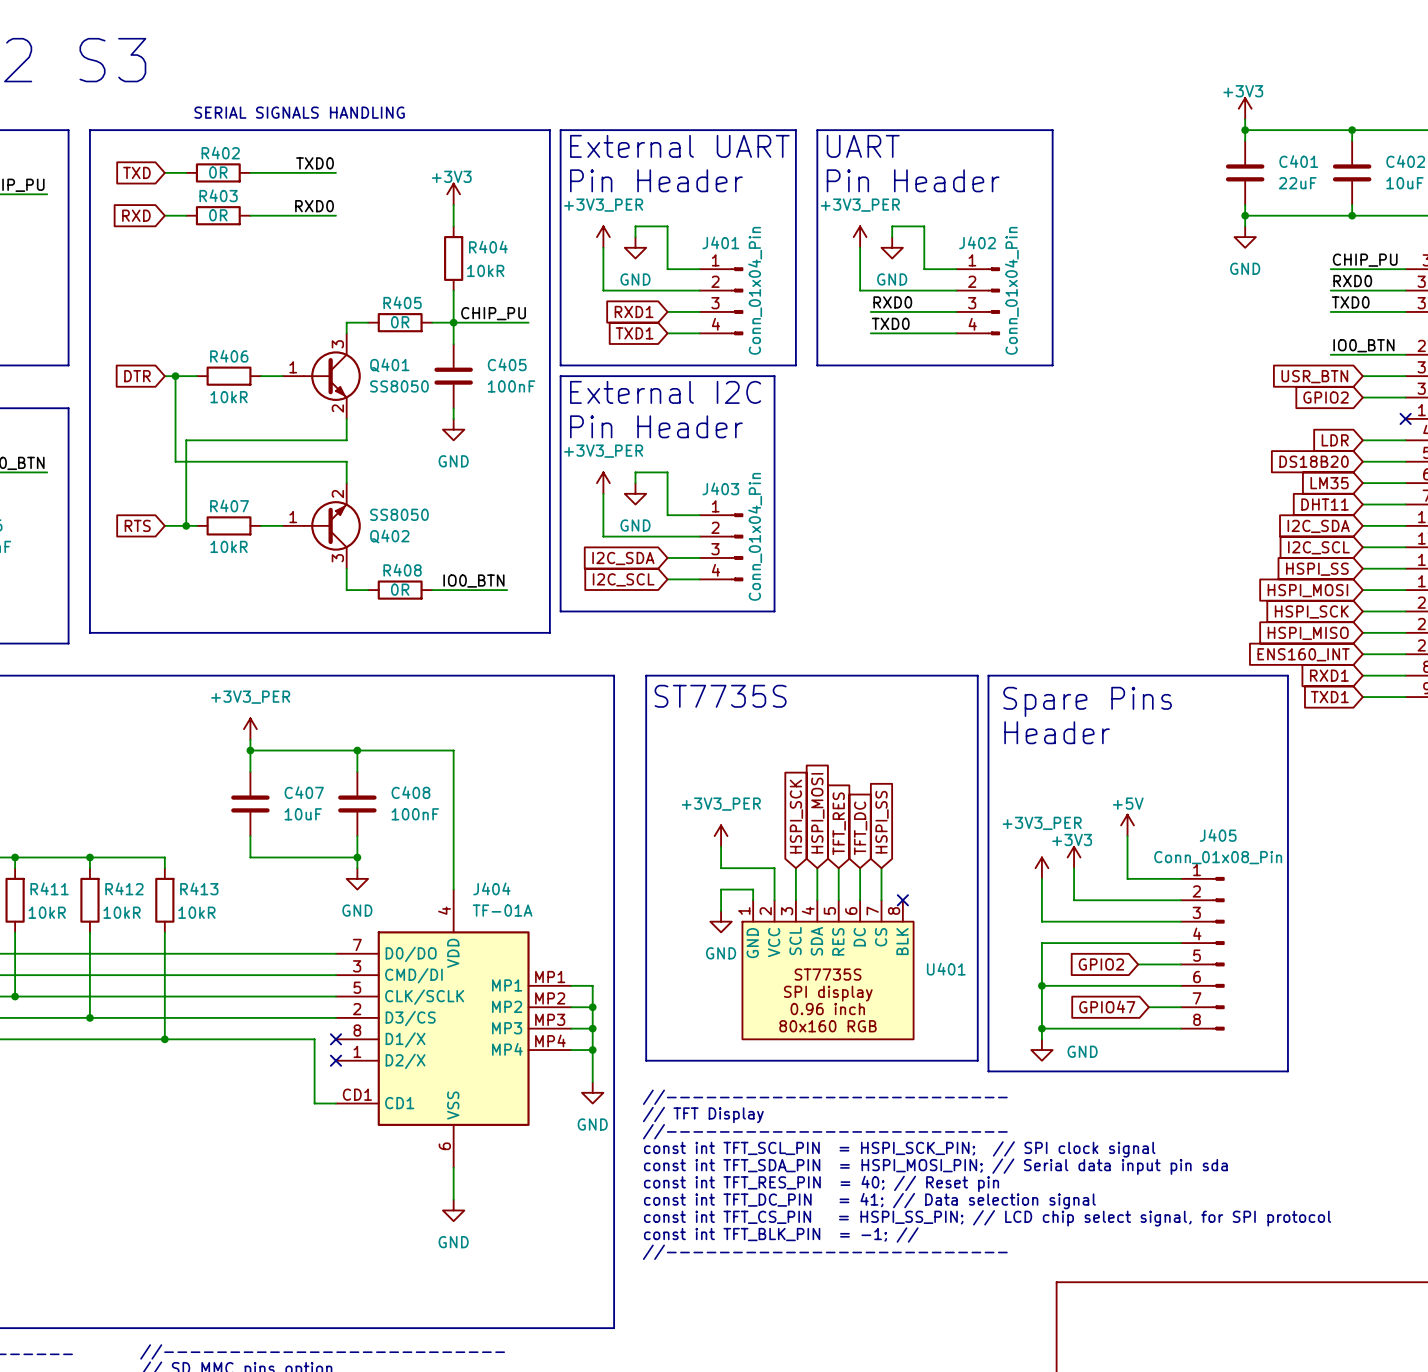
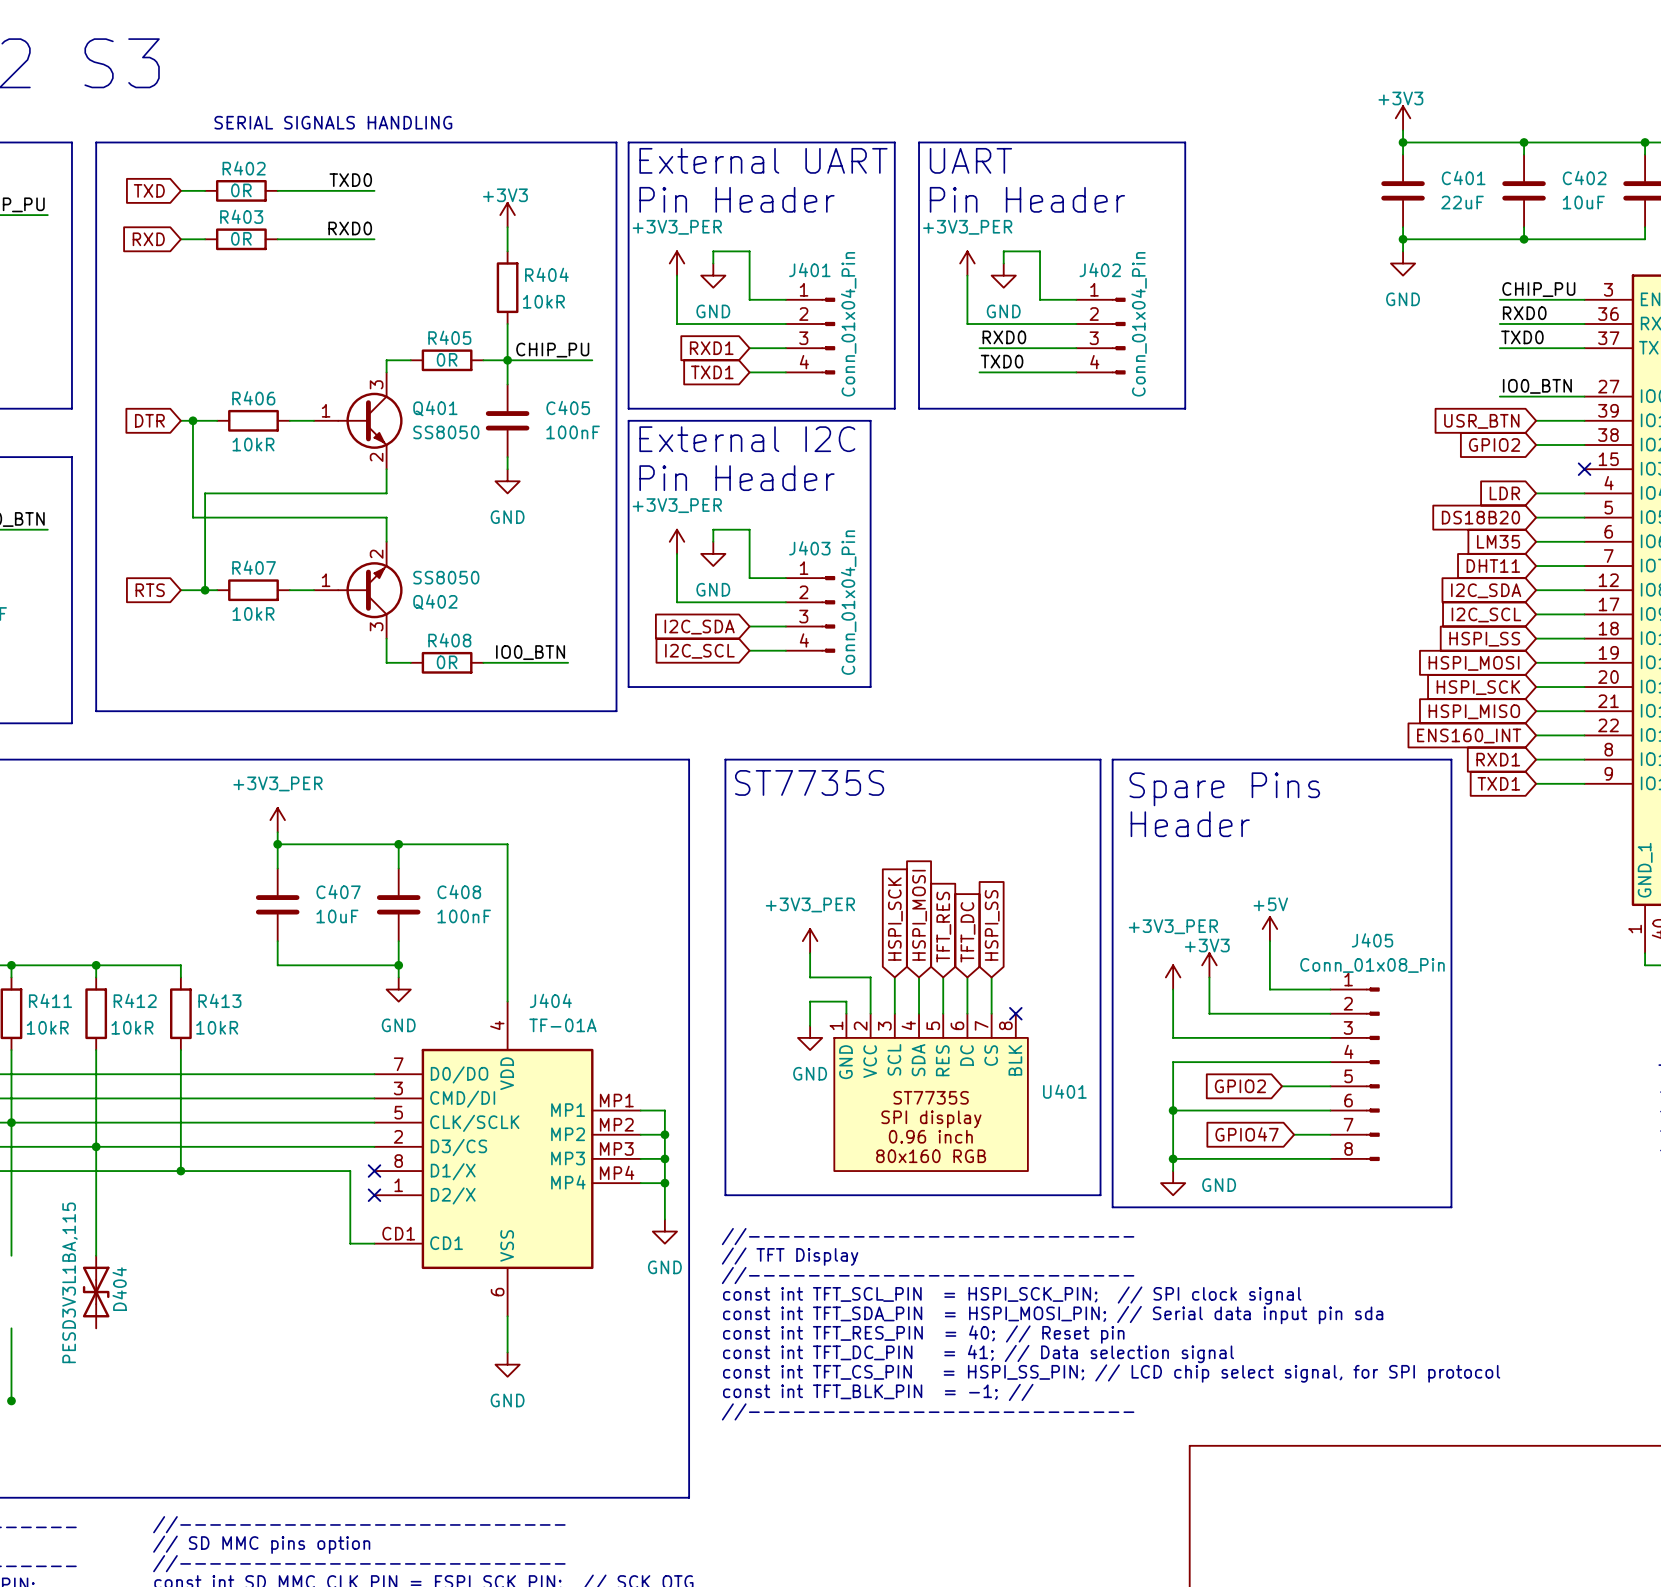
wire: none -> (11, 1122) (11, 1255)
wire: none -> (96, 1146) (96, 1255)
D404: none -> PESD3V3L1BA,115 (96, 1292)
wire: none -> (11, 1328) (11, 1400)
junction: none -> (11, 1400)

